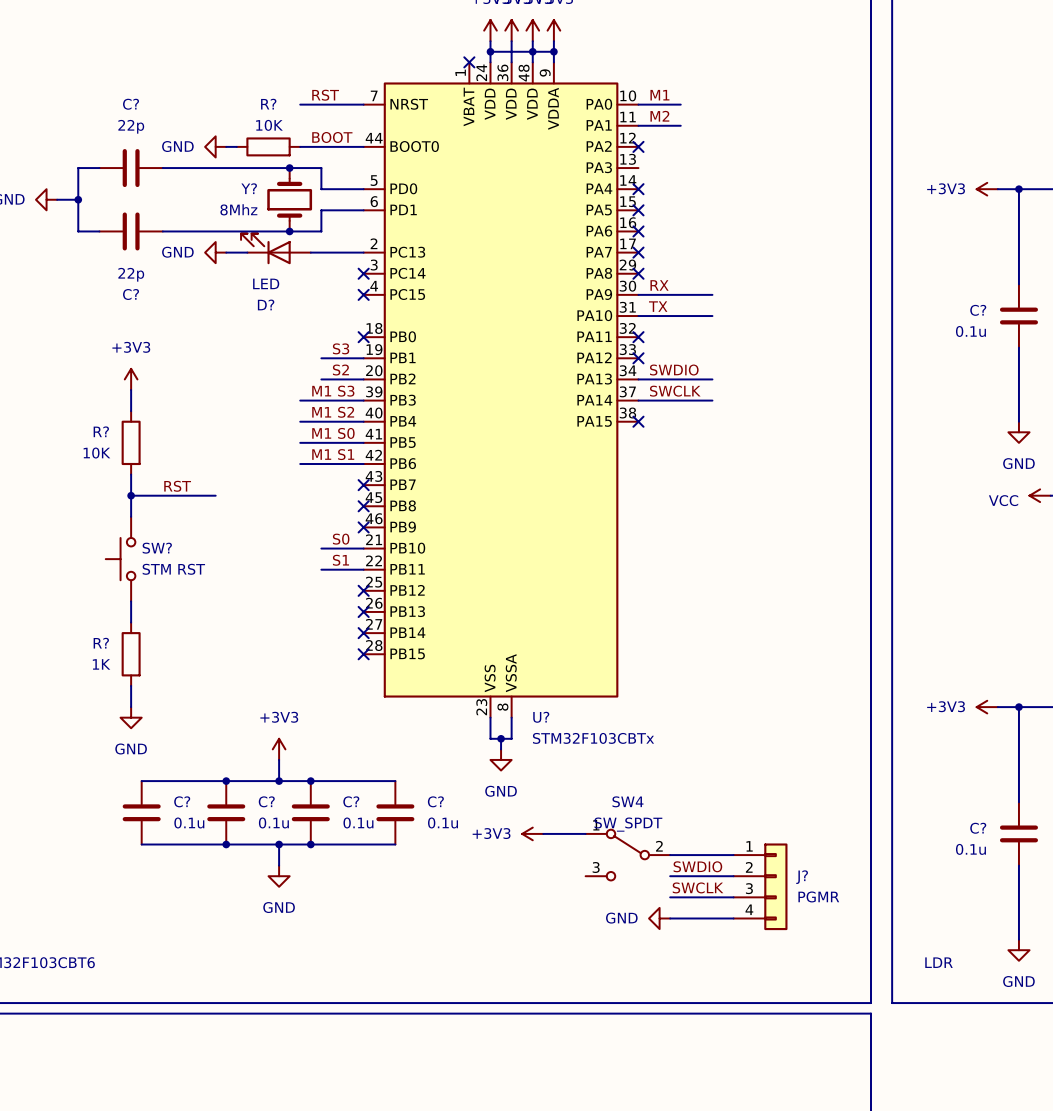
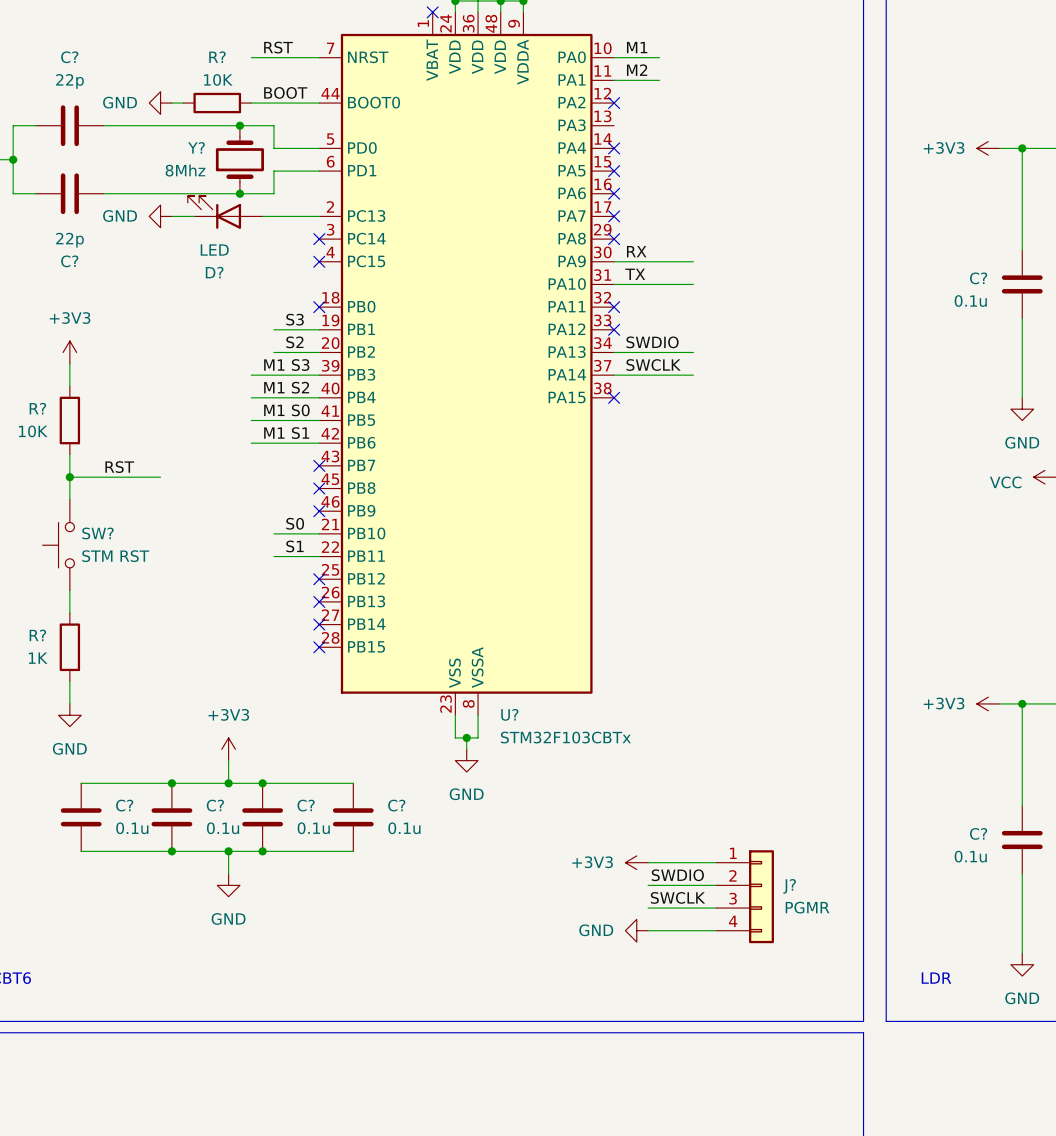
power symbol position: +3V3 (532, 833) -> +3V3 (636, 862)
wire: (543, 833) (585, 833) -> none
SW4: SW_SPDT (627, 855) -> none

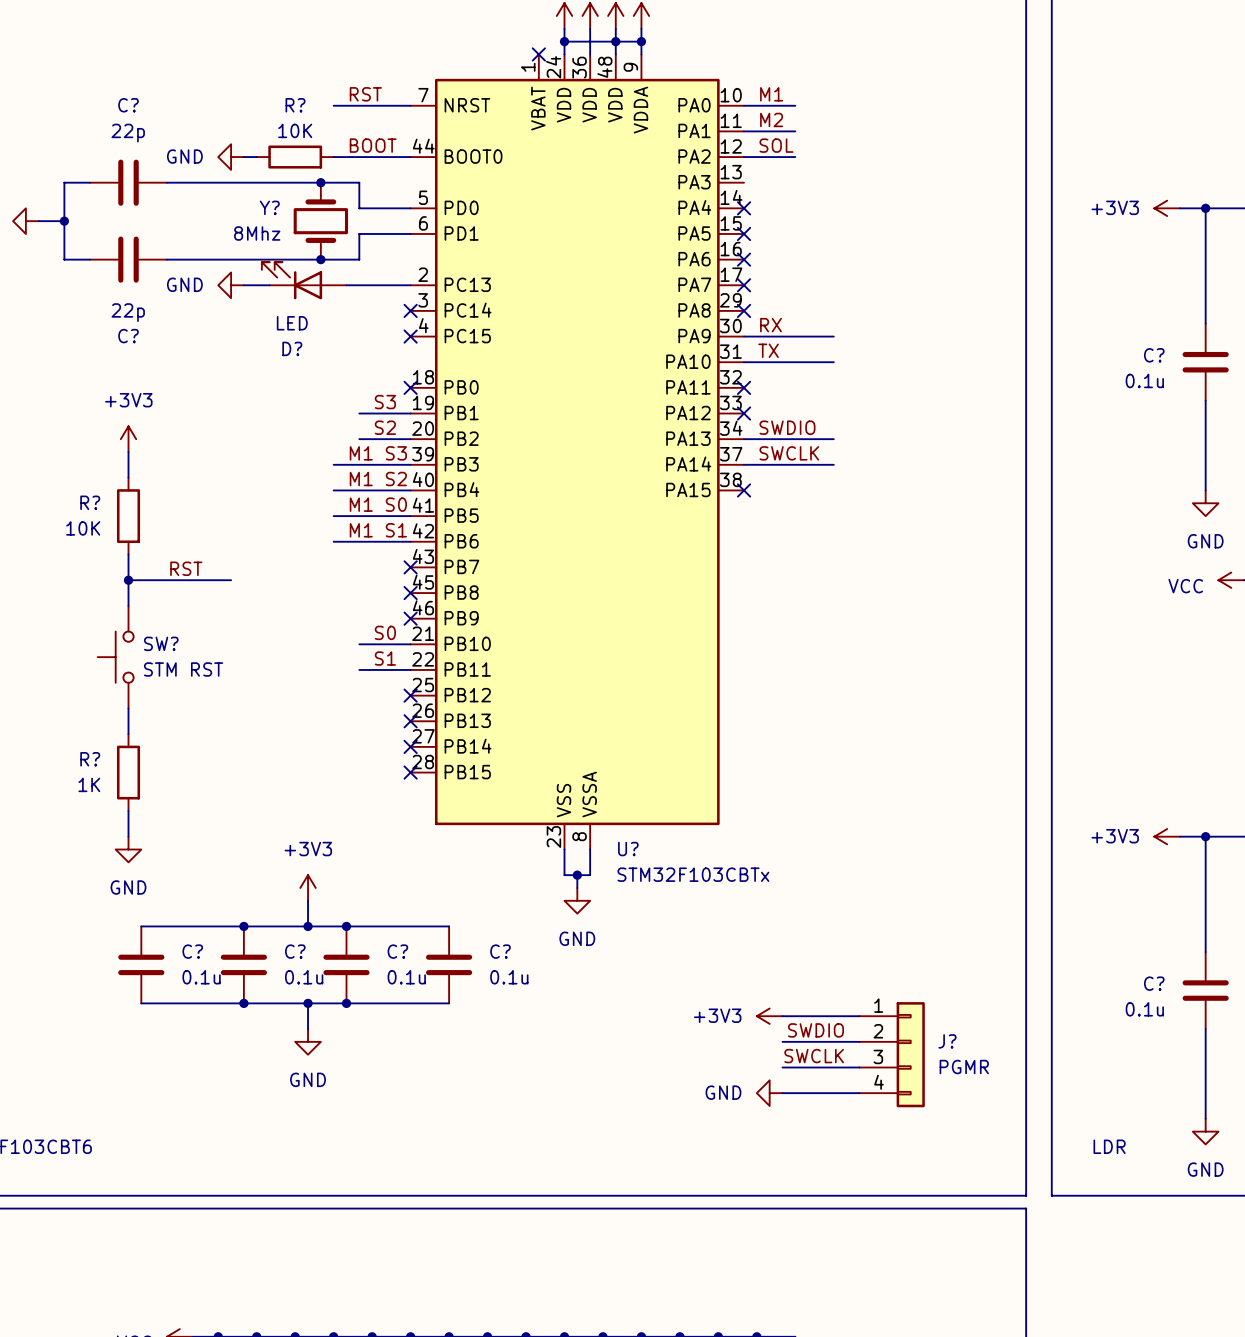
label: none -> SOL (776, 145)
wire: none -> (744, 157) (795, 157)
no-connect mark: (614, 103) -> none

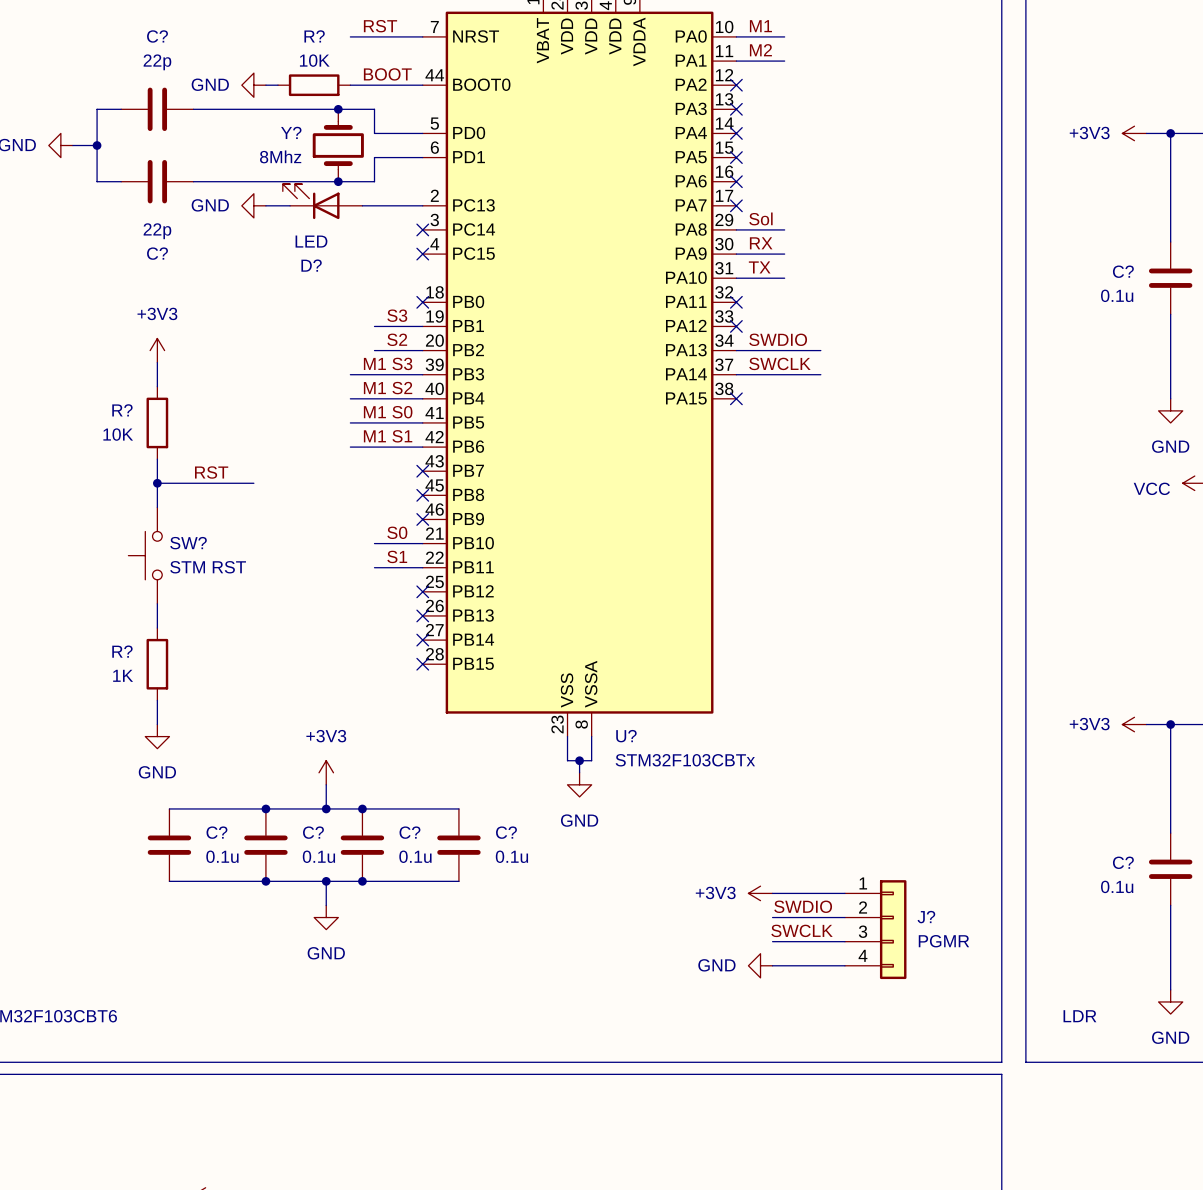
label: SOL (776, 145) -> none
wire: (744, 157) (795, 157) -> (736, 229) (784, 229)
no-connect mark: none -> (736, 85)
no-connect mark: none -> (736, 109)
label: none -> Sol (760, 218)
no-connect mark: (744, 310) -> none
wire: (795, 336) (833, 336) -> none
wire: (795, 362) (833, 362) -> none

